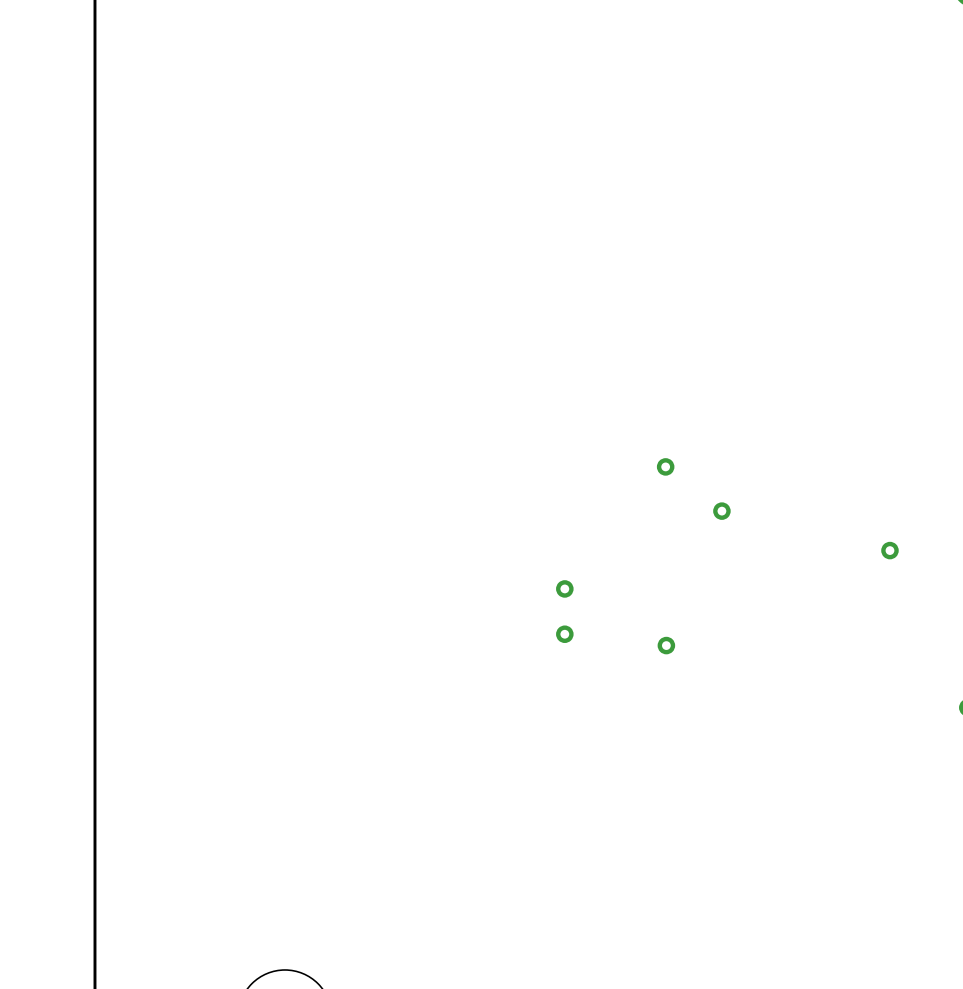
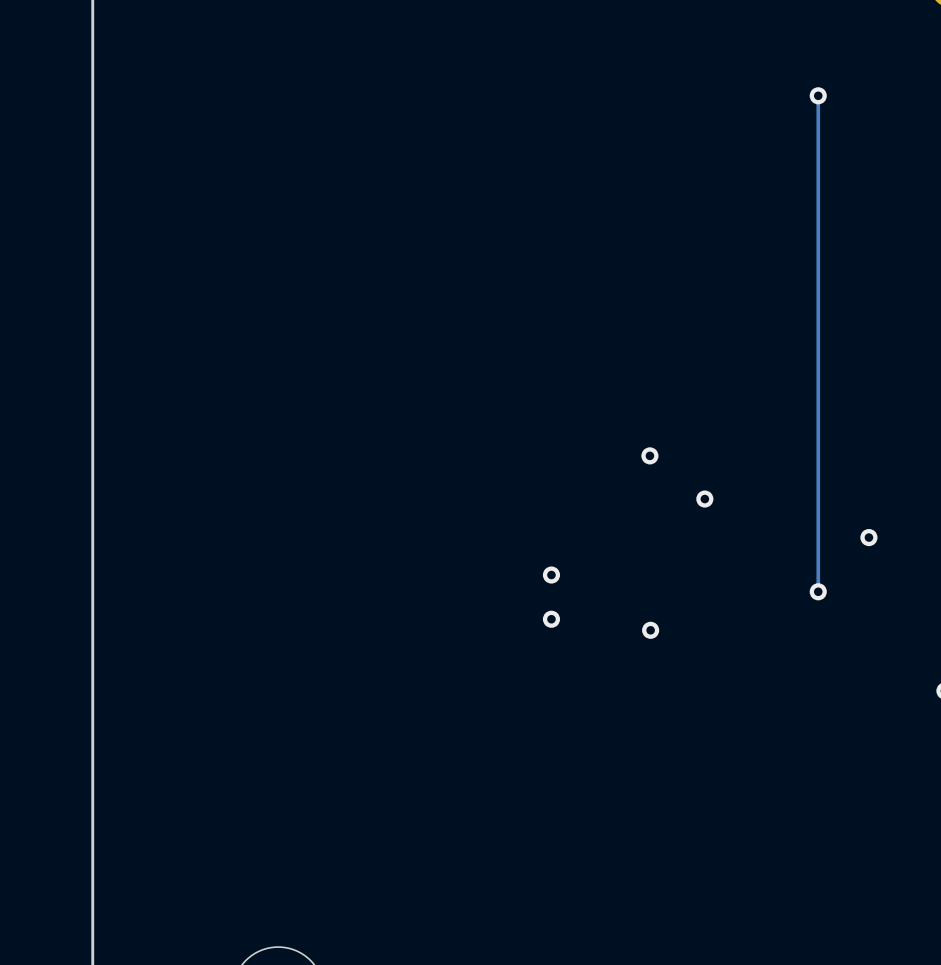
track: none -> (818, 95) (818, 591)
via: none -> (818, 95)
via: none -> (818, 591)

